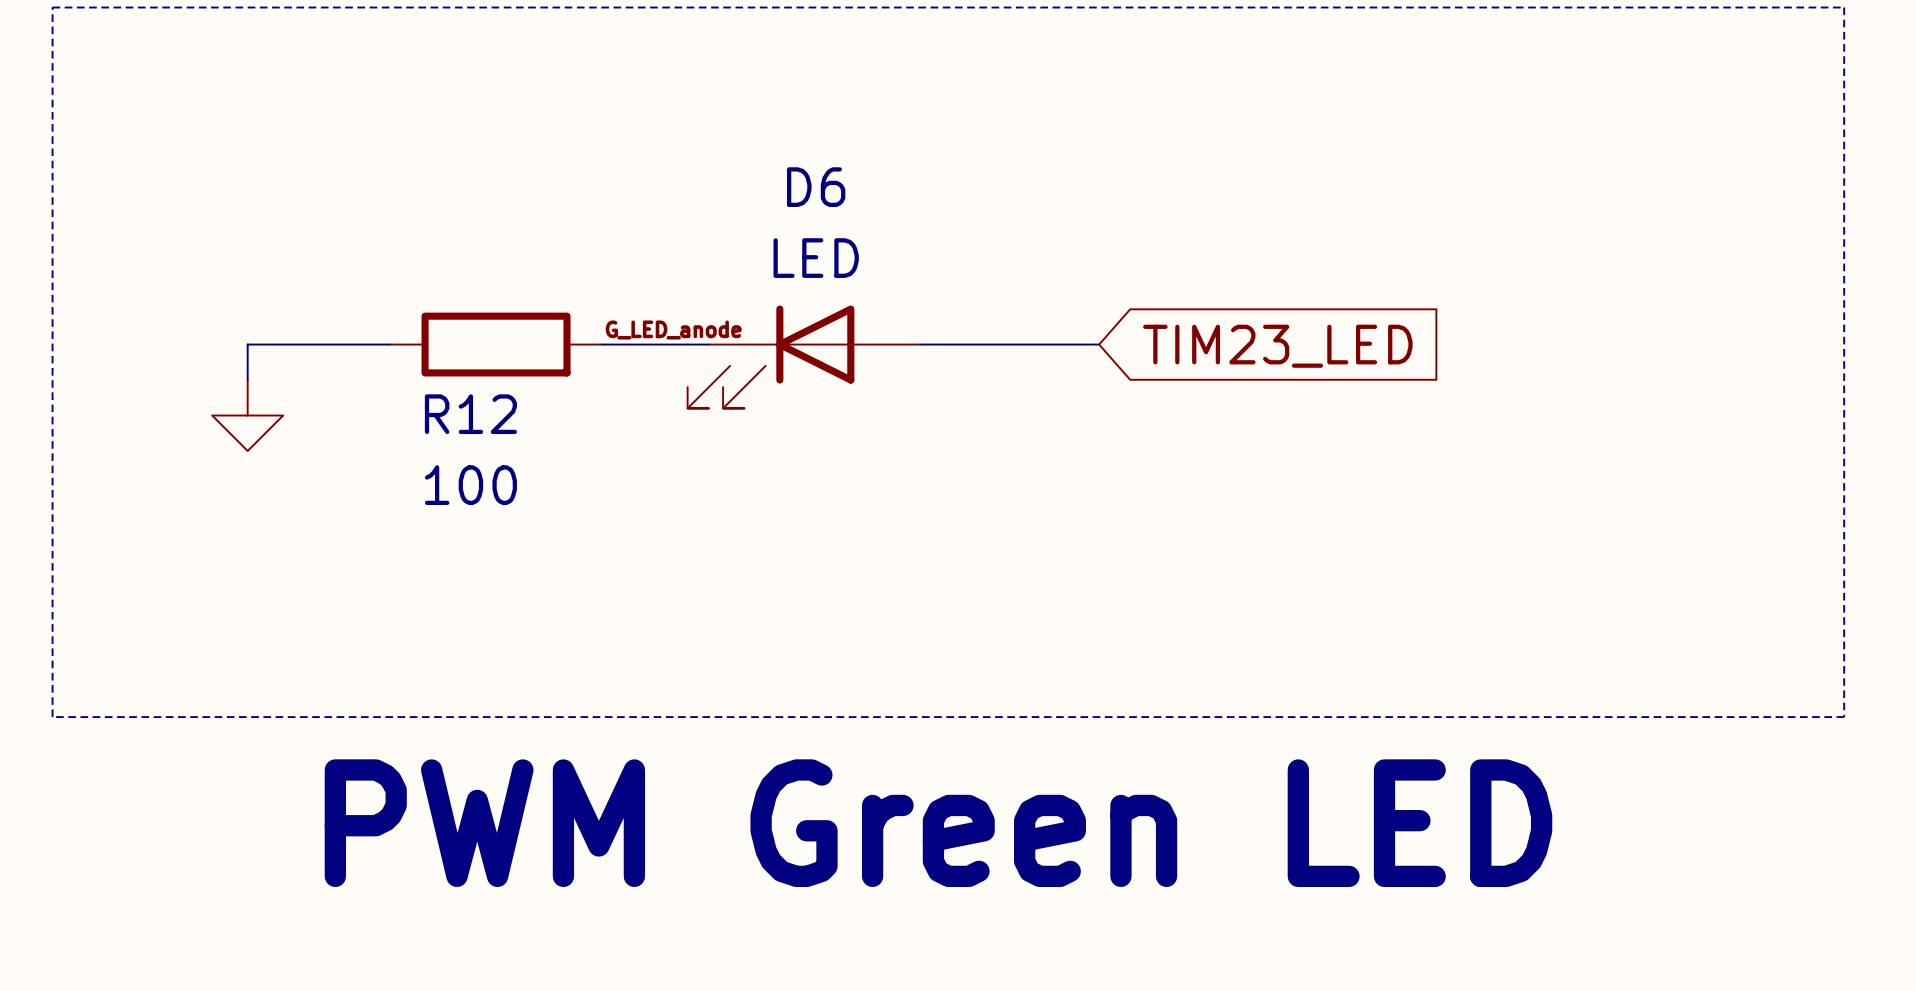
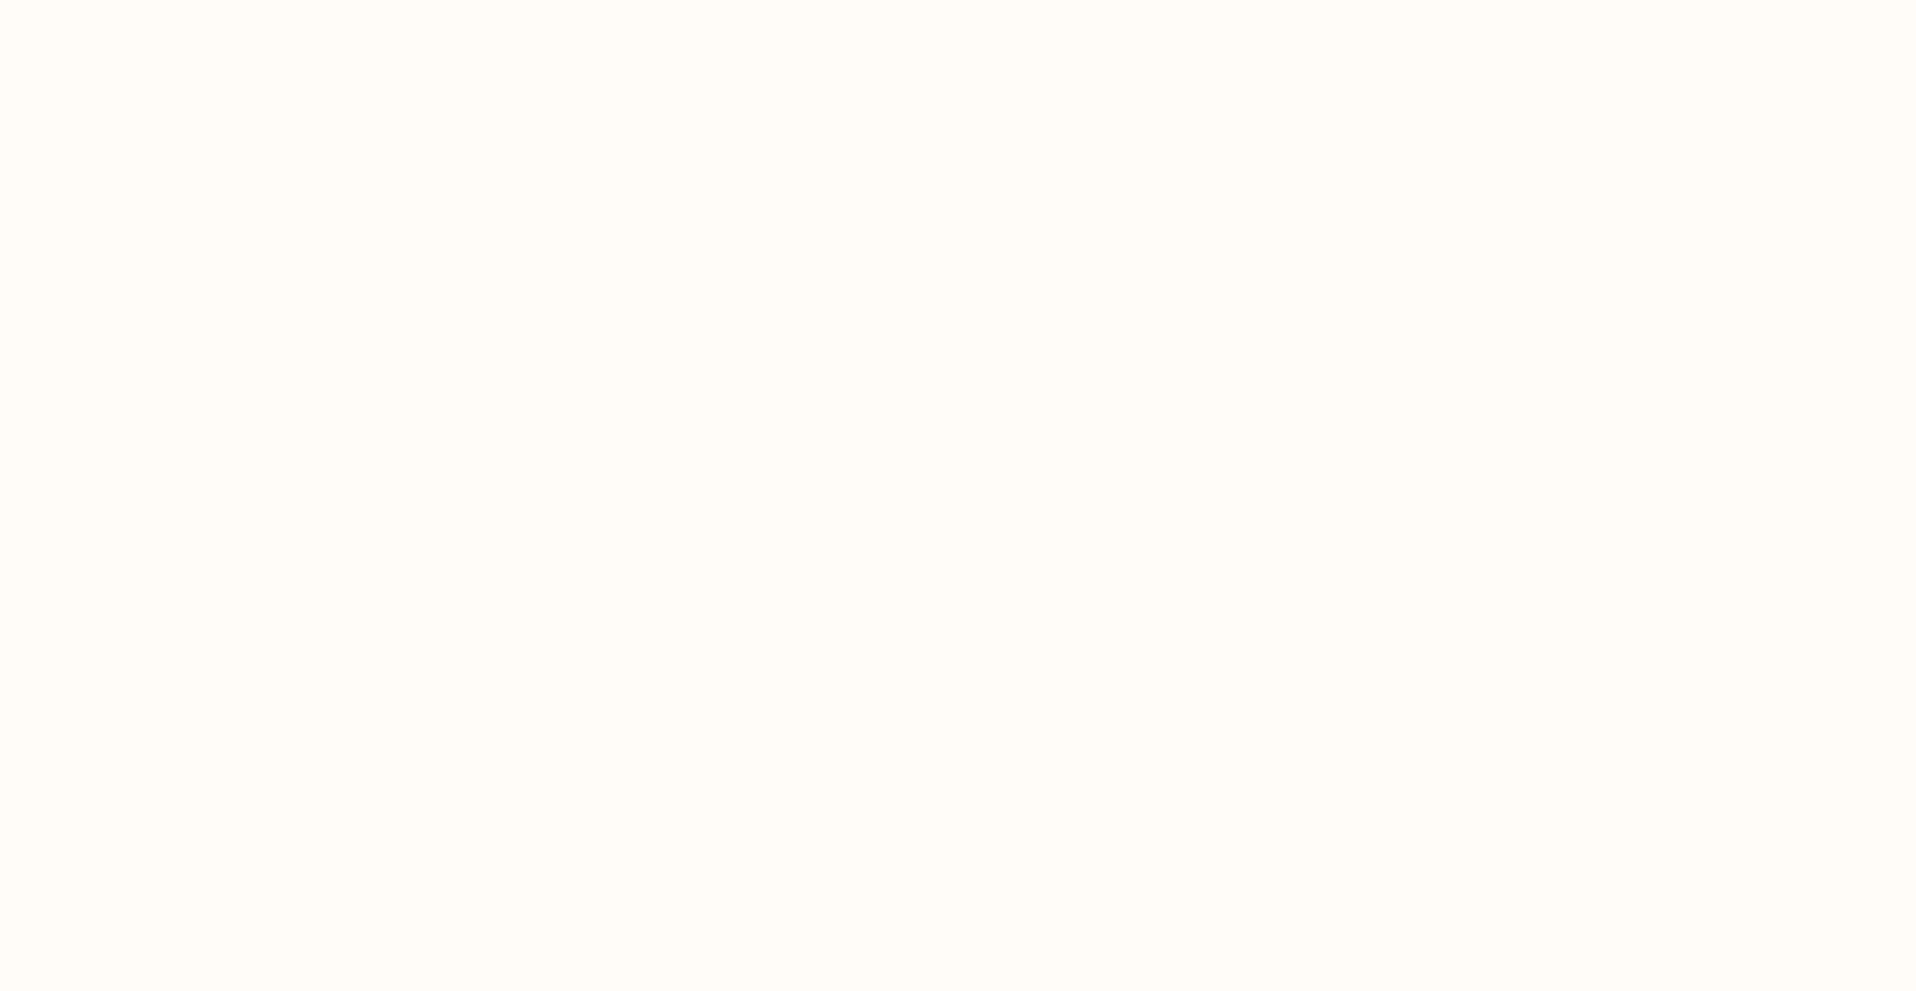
line: (52, 7) (1844, 7) (1844, 717) (52, 717) (52, 7) -> none
label: G_LED_anode (673, 330) -> none
wire: (389, 344) (247, 344) (247, 380) -> none
R12: 100 (496, 344) -> none
wire: (602, 344) (708, 344) -> none
wire: (921, 344) (1099, 344) -> none
global label: TIM23_LED (1277, 346) -> none
D6: LED (804, 356) -> none
power symbol: (247, 415) -> none
text: PWM Green LED (938, 823) -> none

